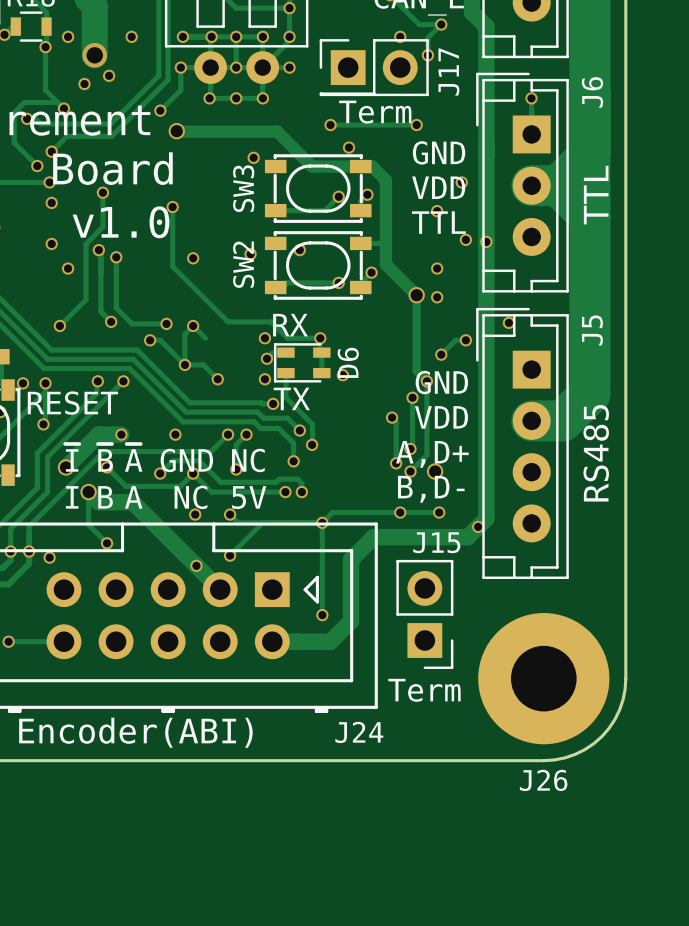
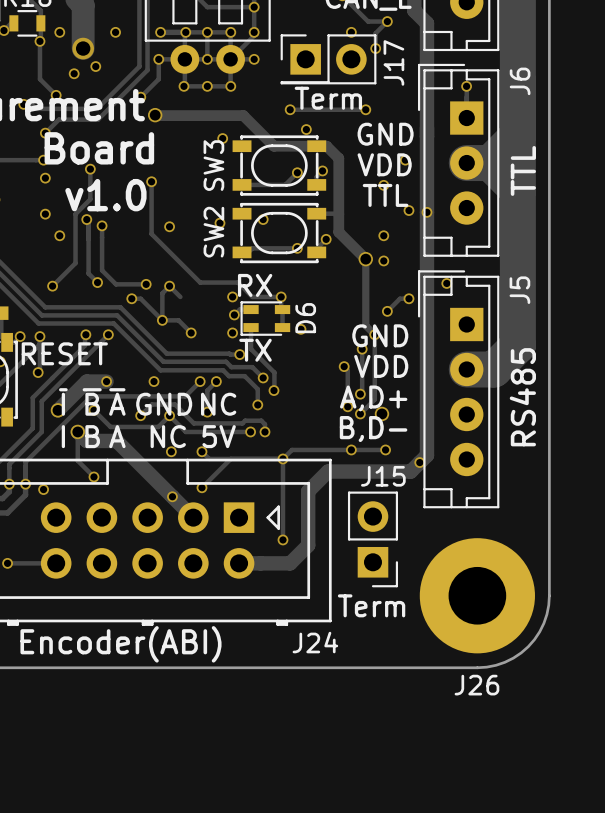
track: (57, 102) (24, 102) (14, 112) (14, 142) (37, 166) -> none
via: (37, 166) -> none

